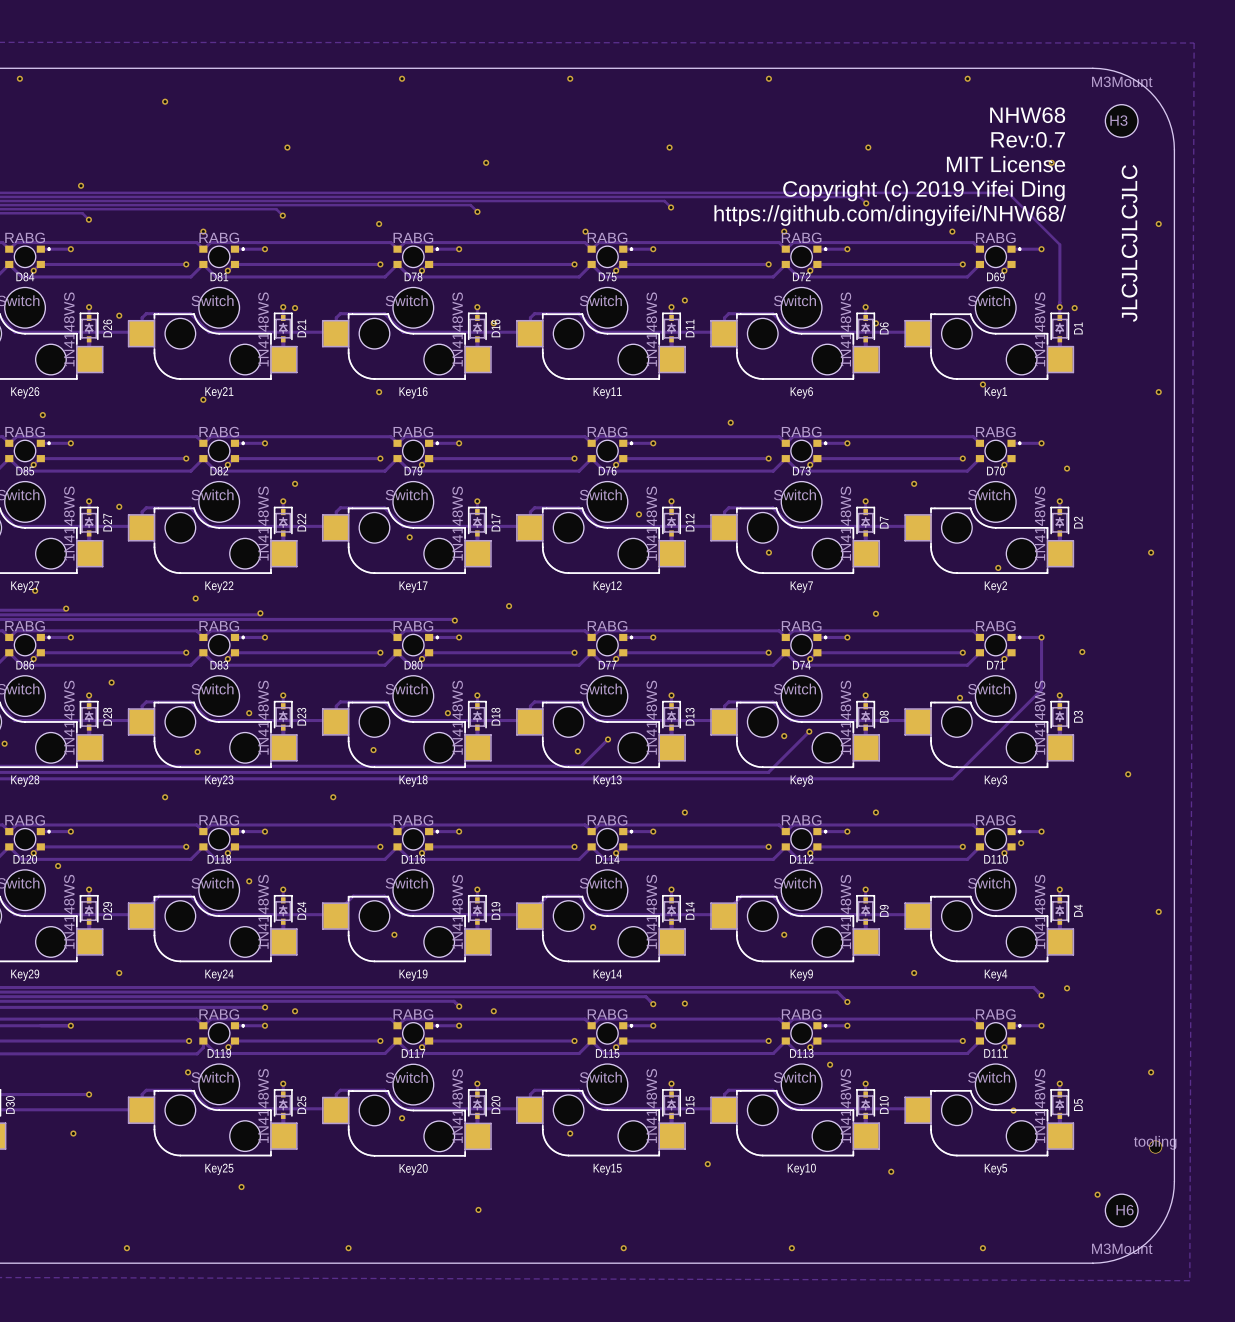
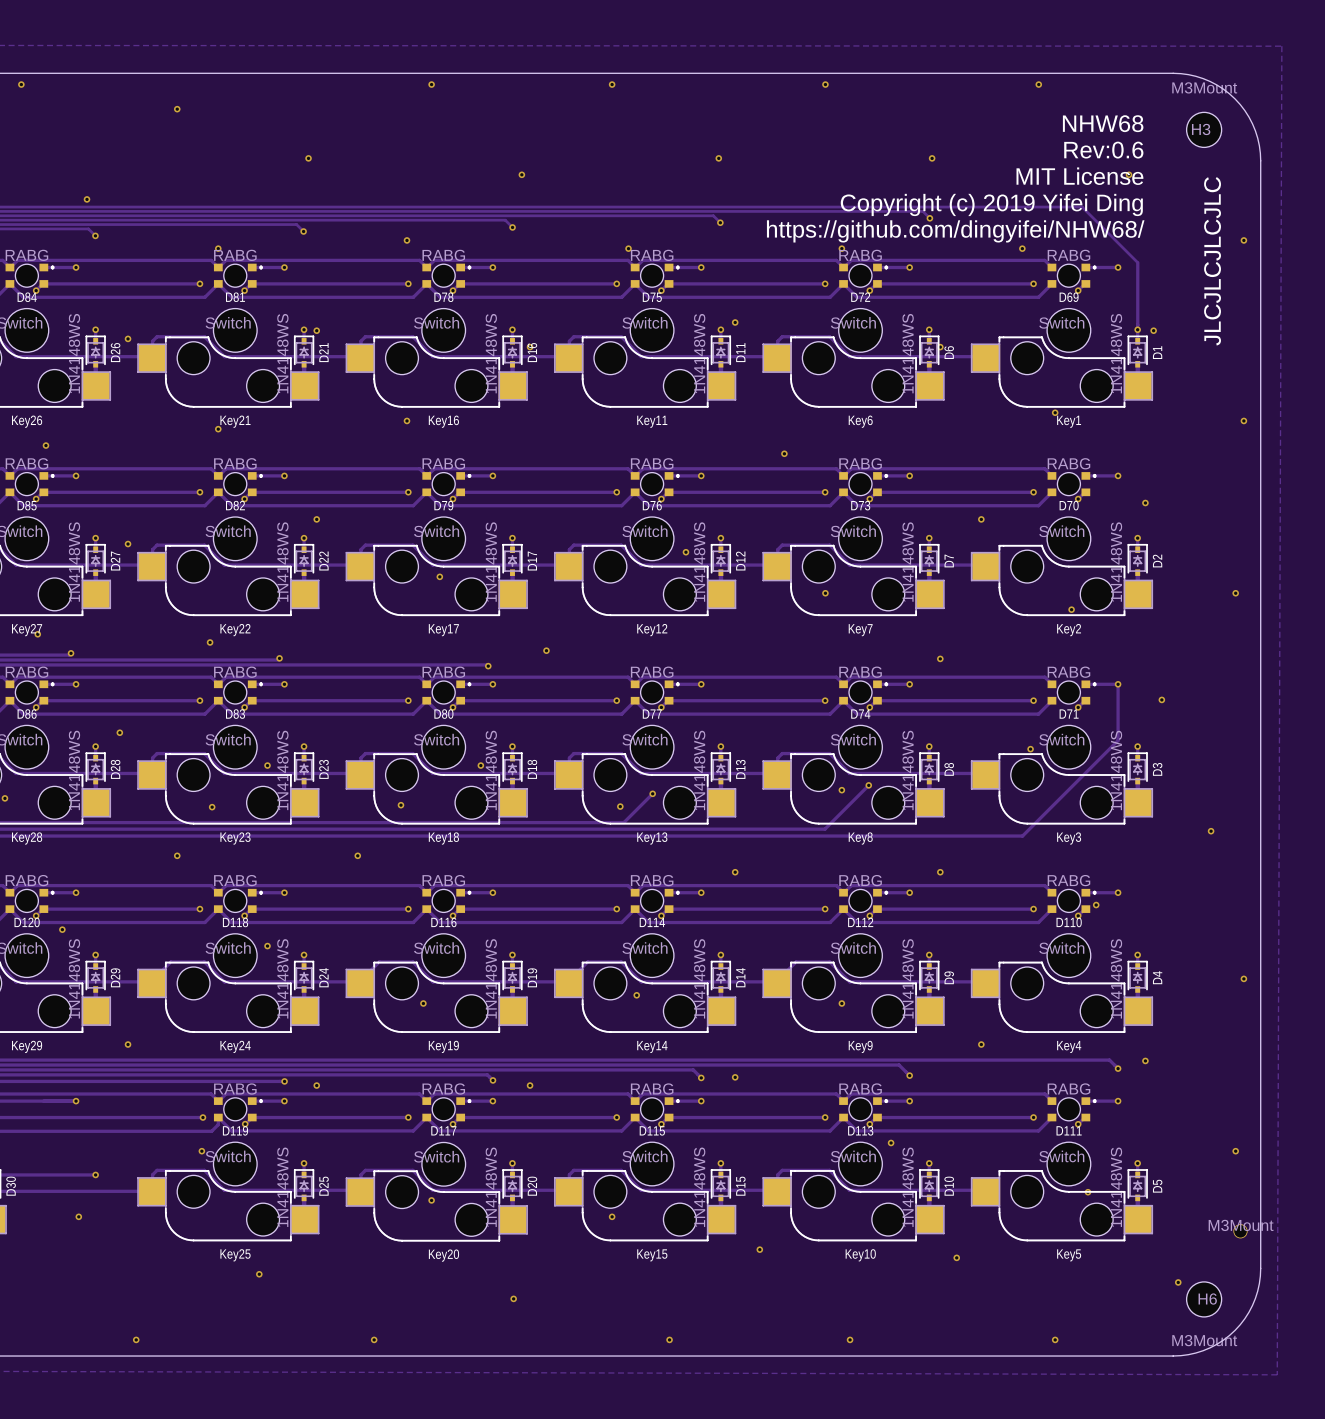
text: Rev:0.7 (1028, 139) -> Rev:0.6 (1103, 150)
part value: tooling (1155, 1142) -> M3Mount (1241, 1225)

